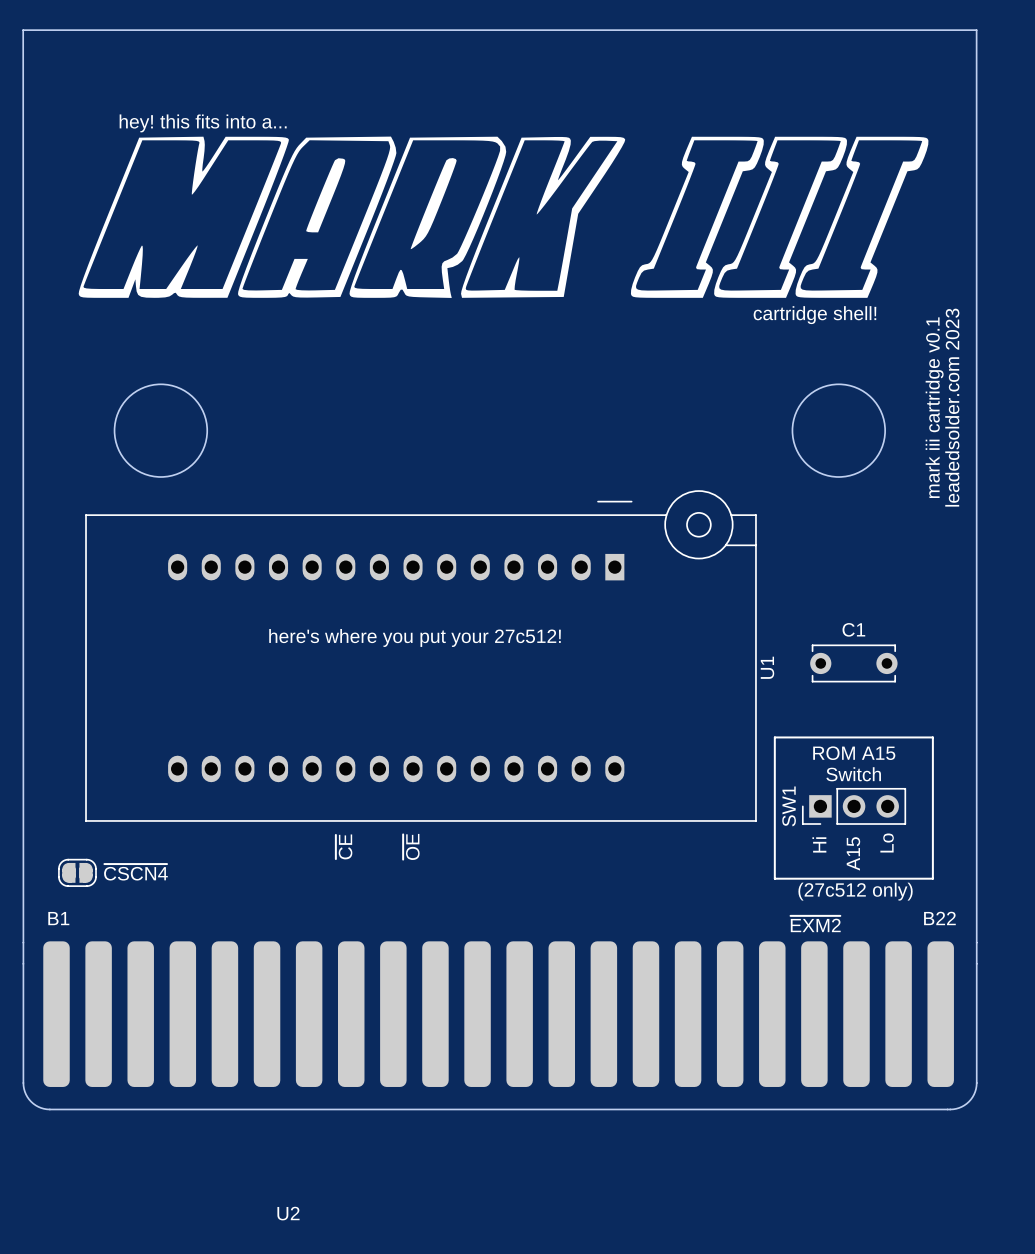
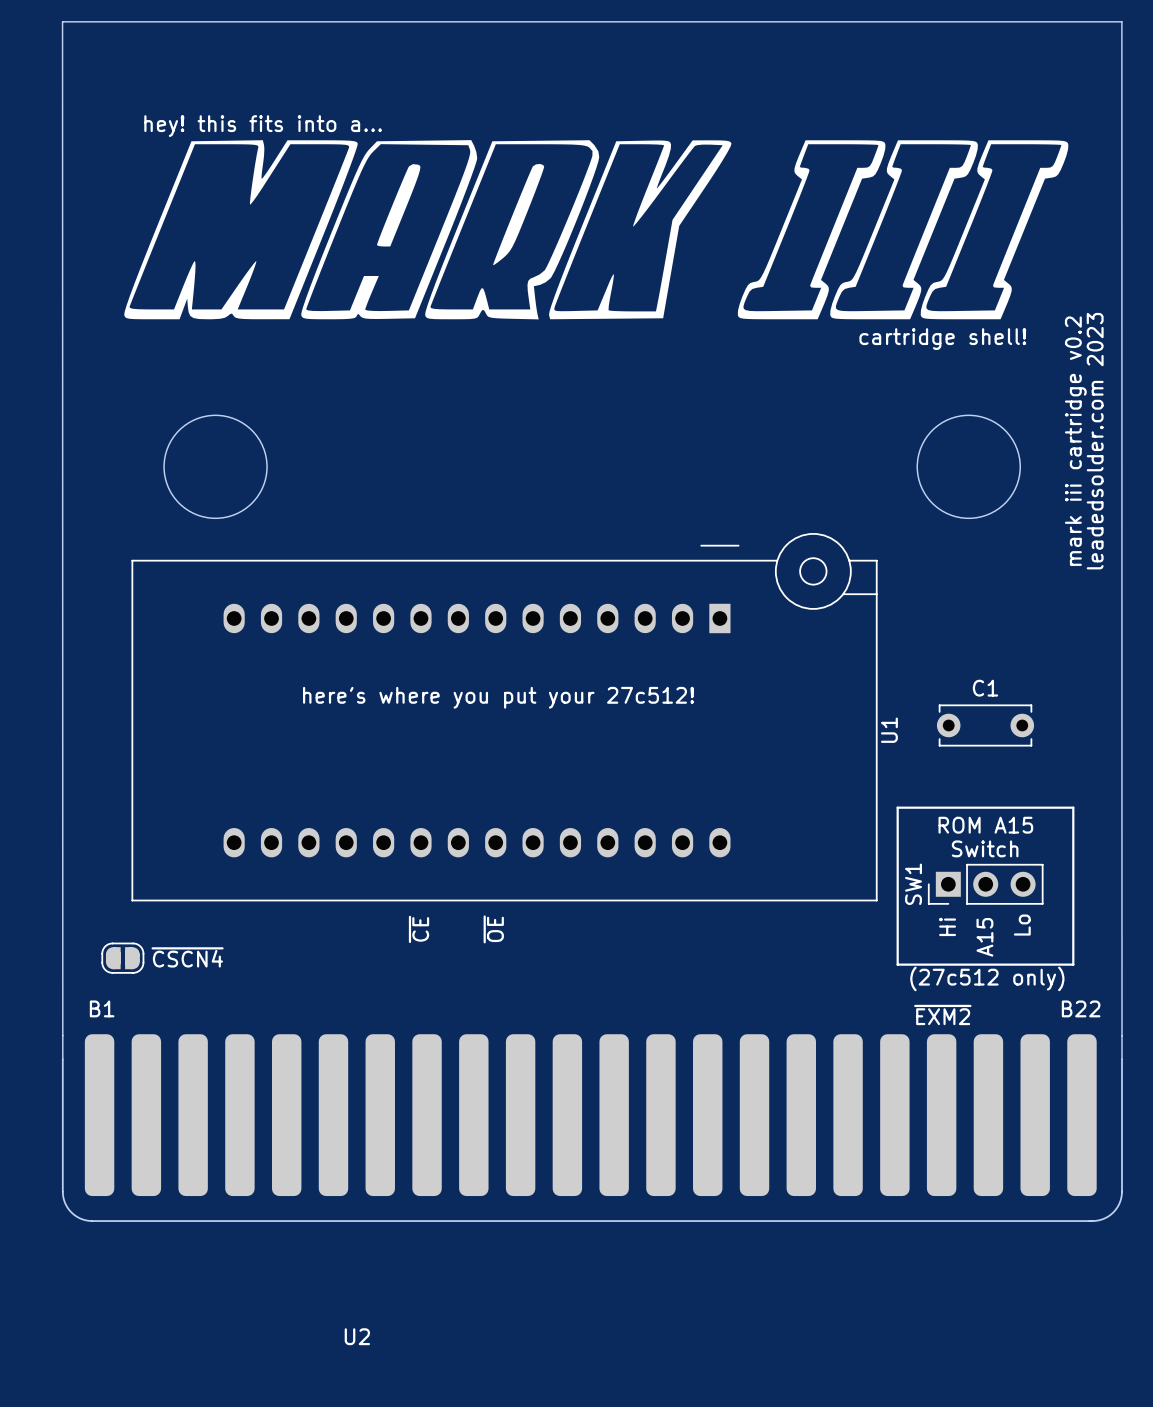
text: mark iii cartridge v0.1 (934, 407) -> mark iii cartridge v0.2 (1075, 441)

